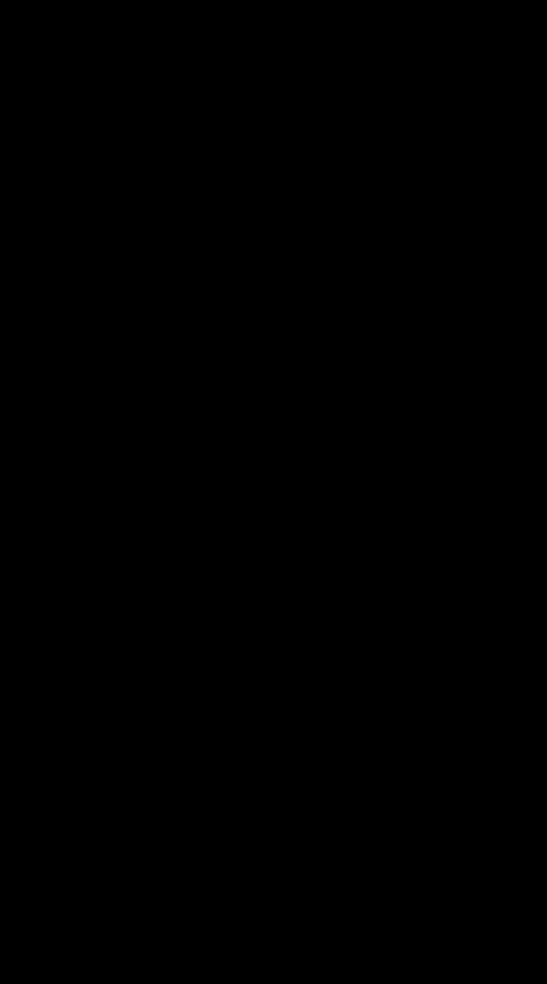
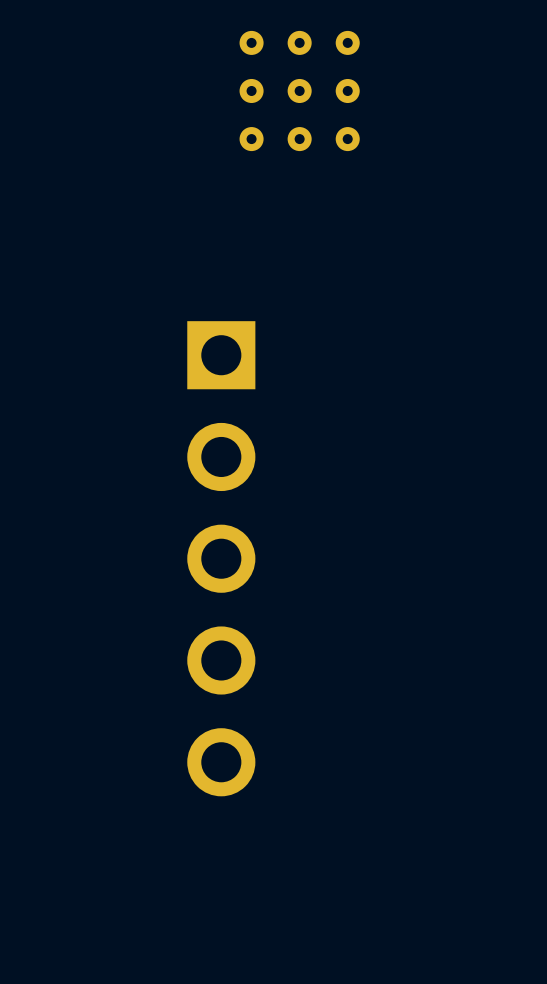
part: none -> (299, 90)
part: none -> (221, 558)

